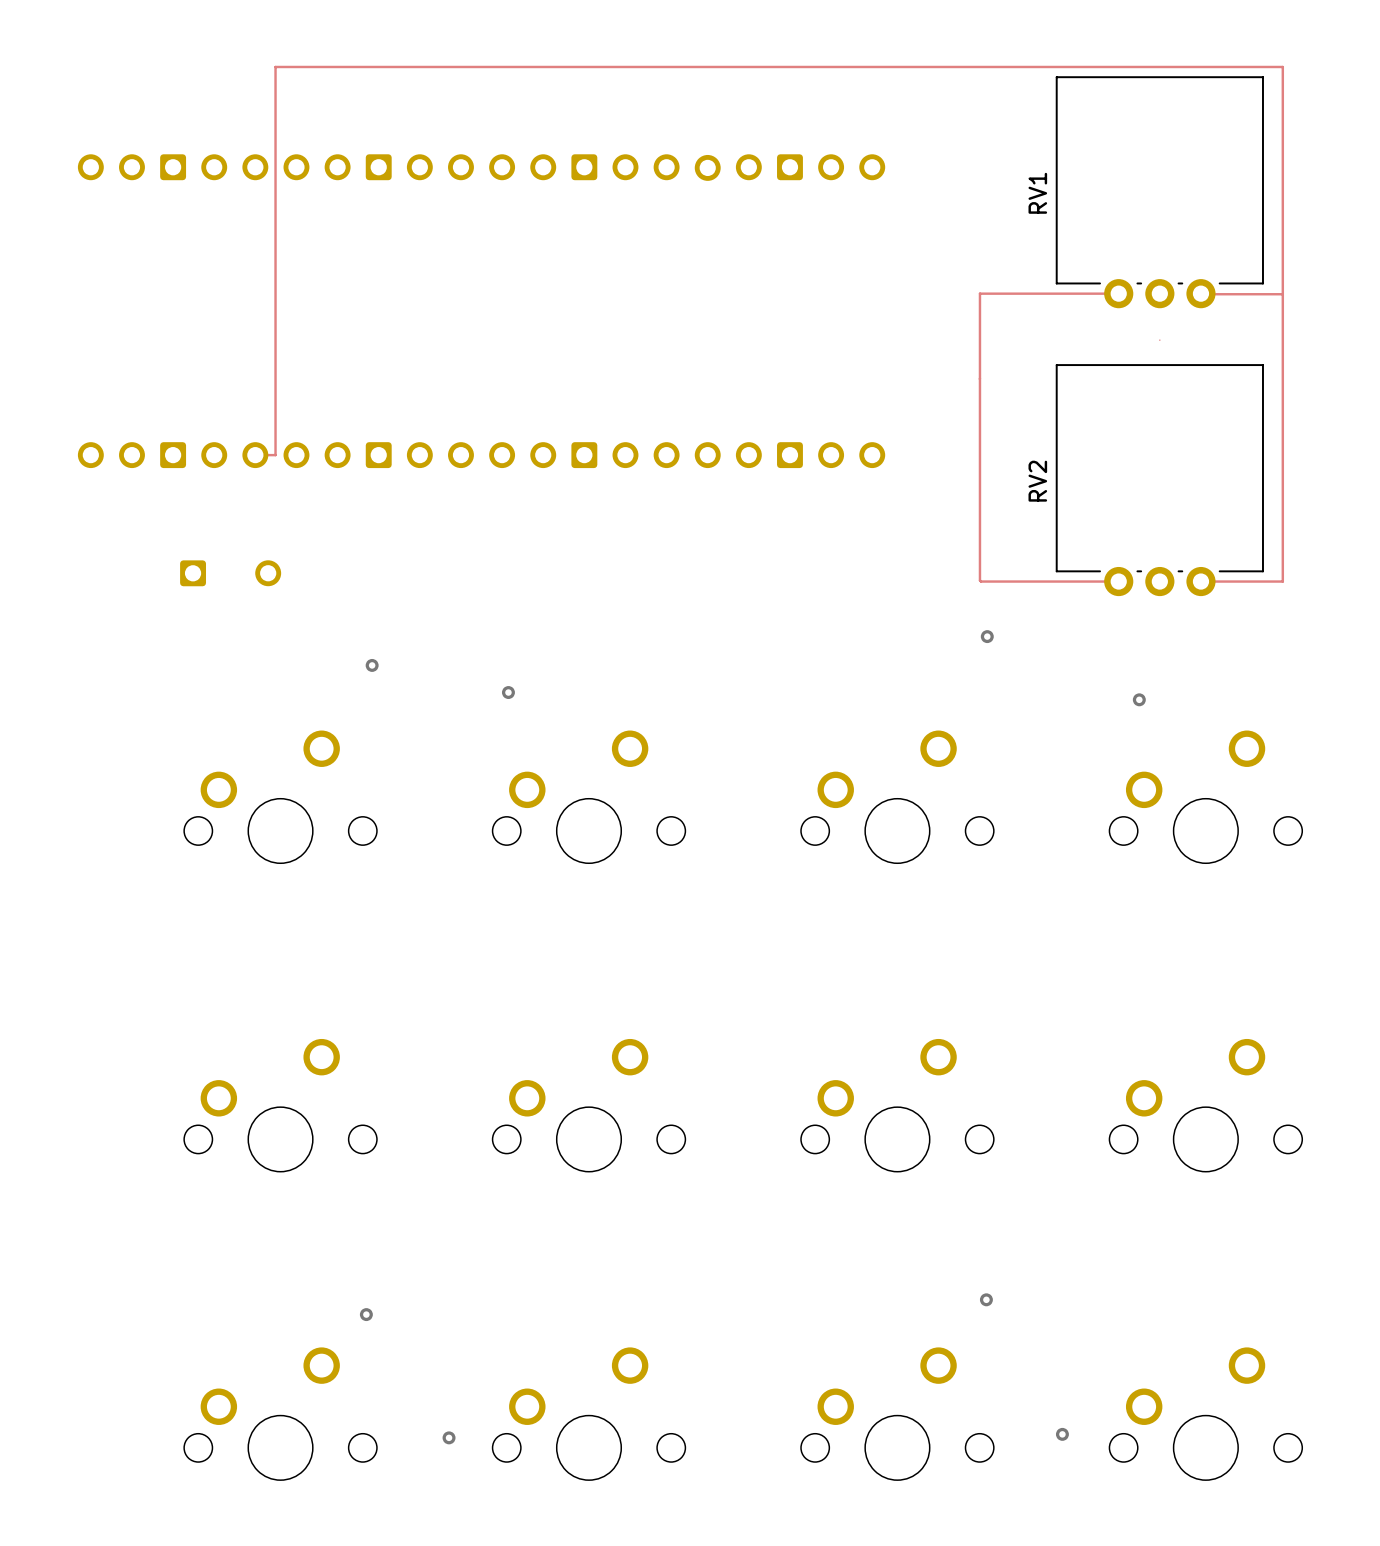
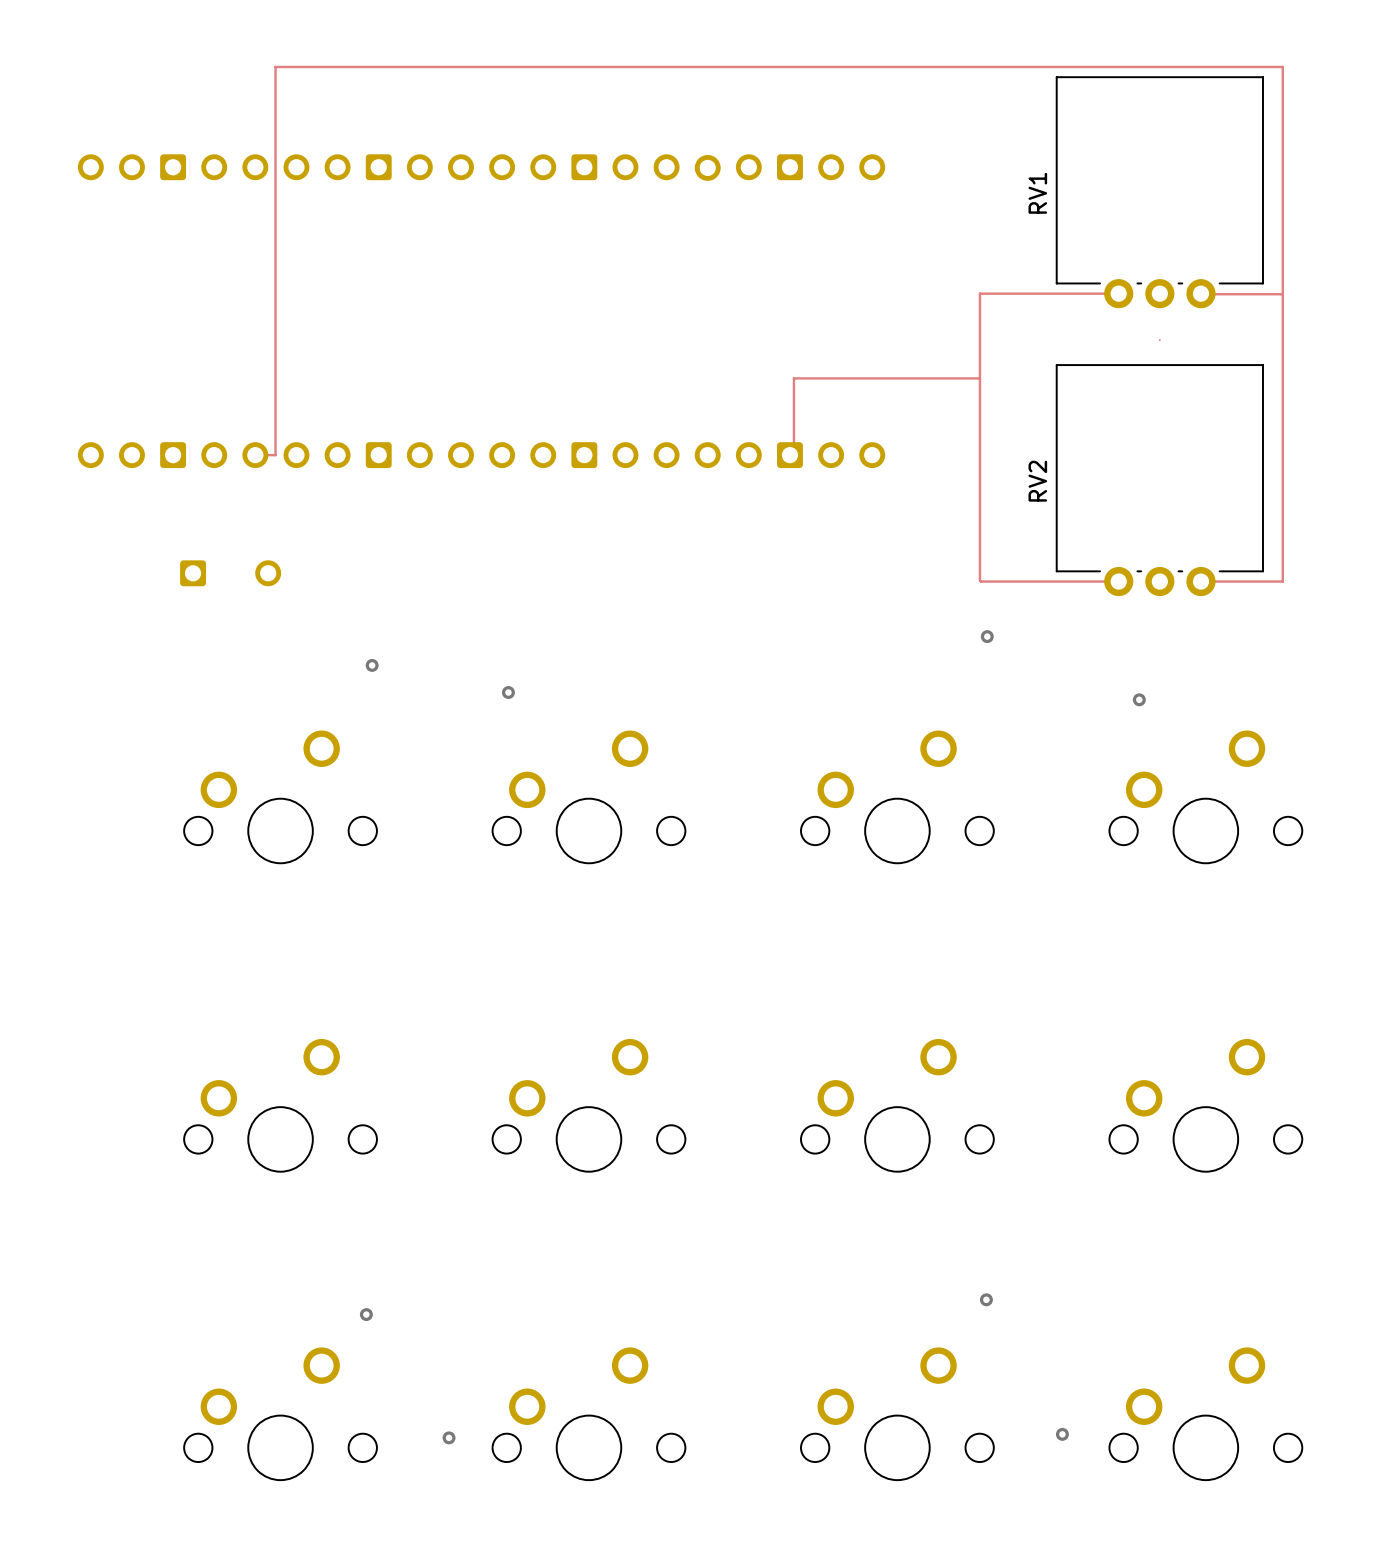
track: none -> (979, 378) (793, 378) (793, 451) (789, 455)

